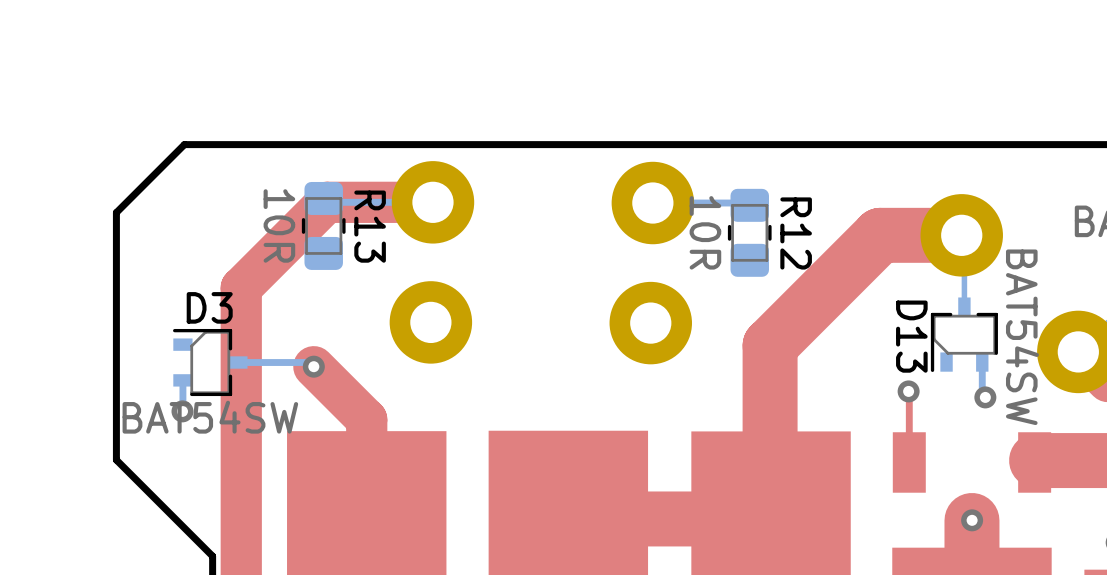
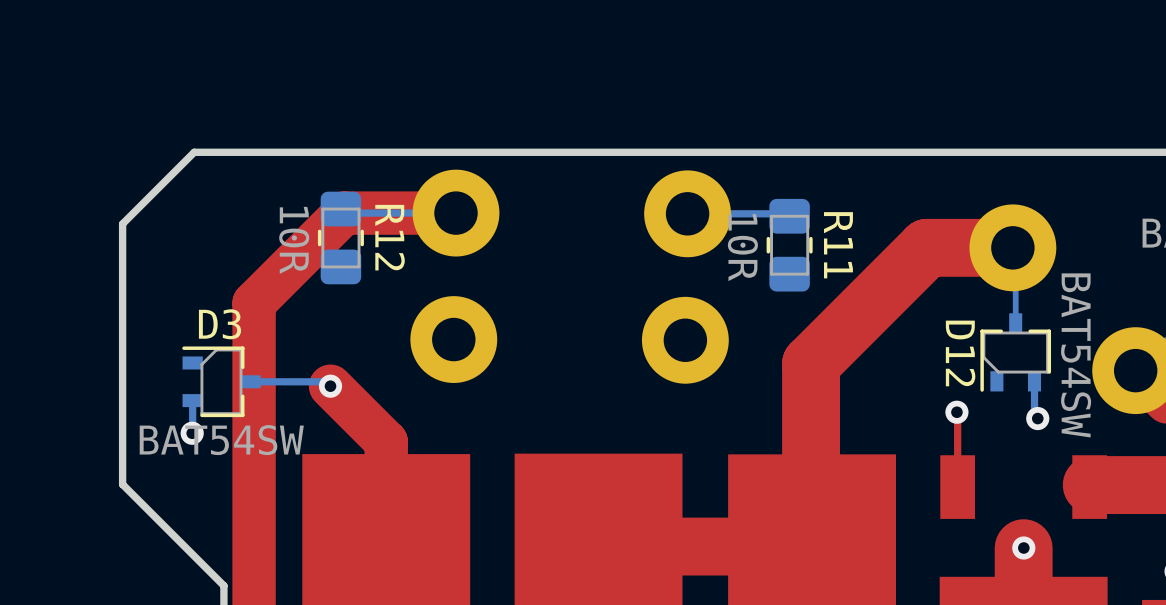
R13 name: R13 (370, 226) -> R12 (390, 237)
R12 name: R12 (796, 233) -> R11 (838, 245)
D13 name: D13 (911, 336) -> D12 (960, 353)

